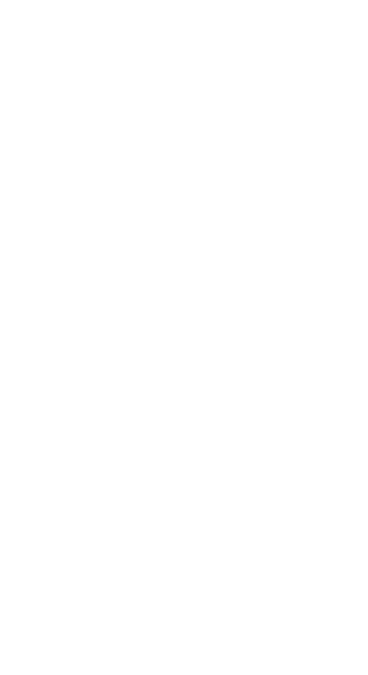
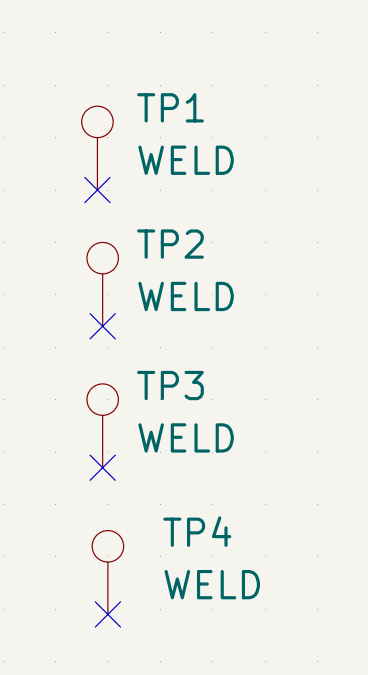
TP1: none -> WELD (97, 148)
no-connect mark: none -> (97, 190)
TP2: none -> WELD (102, 284)
no-connect mark: none -> (102, 326)
TP3: none -> WELD (102, 425)
no-connect mark: none -> (102, 467)
TP4: none -> WELD (107, 572)
no-connect mark: none -> (107, 614)

